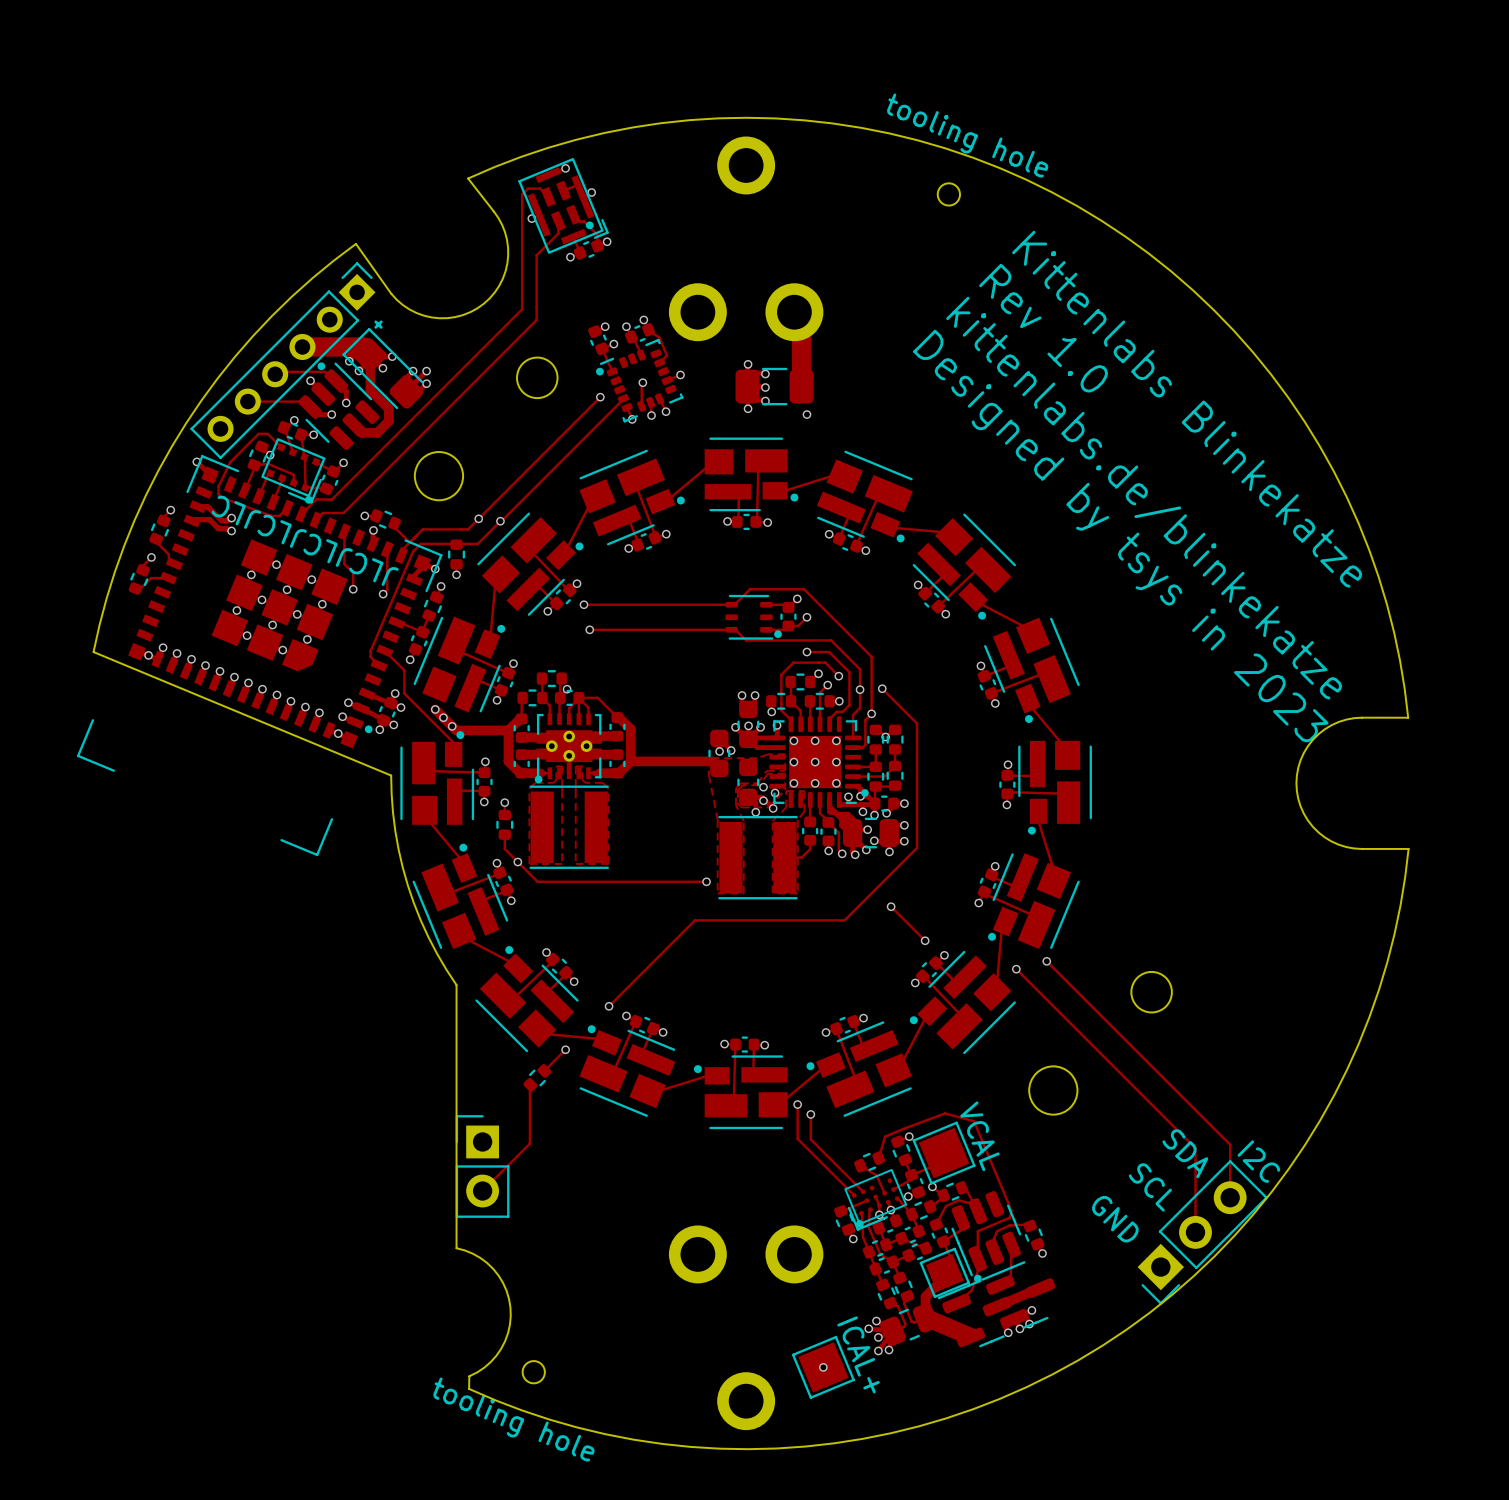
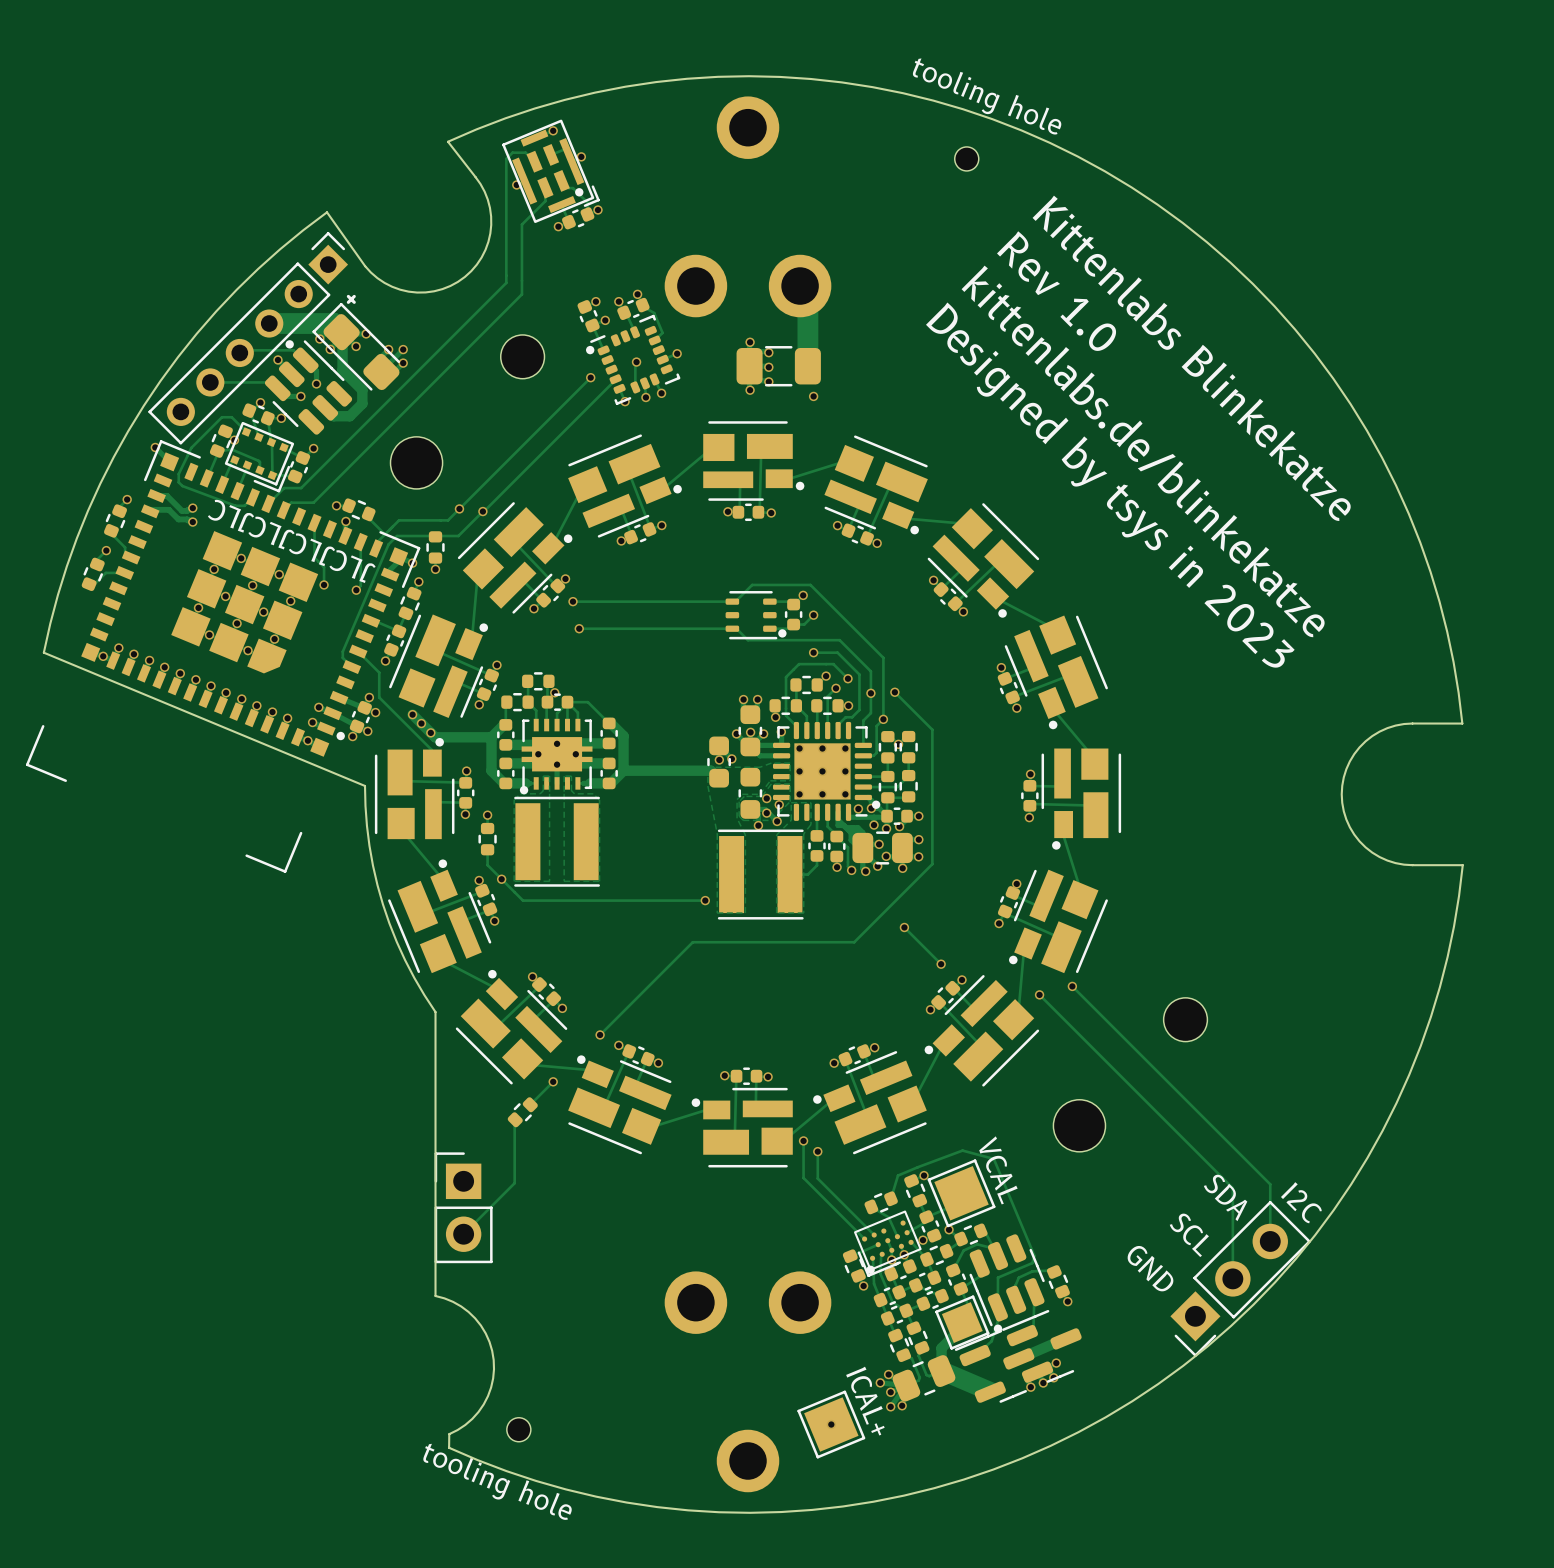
drawing: [304, 495, 313, 504] -> none

